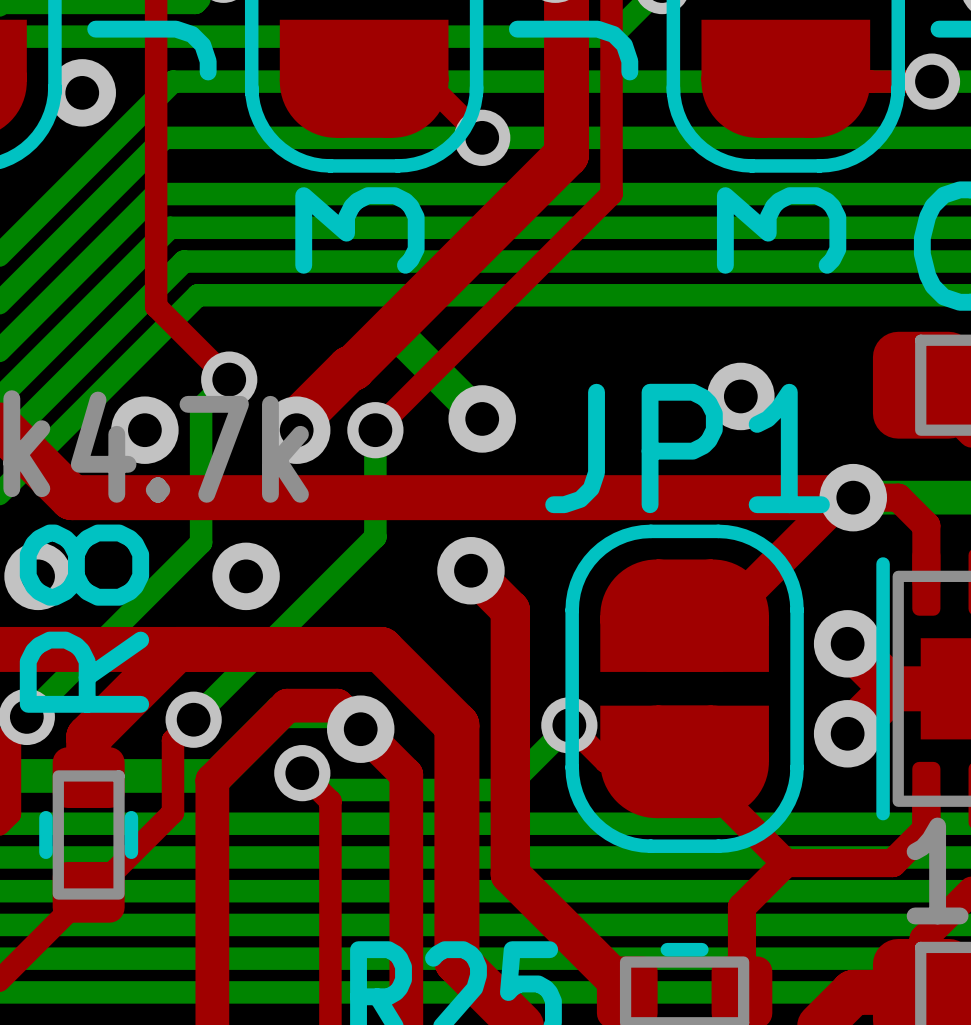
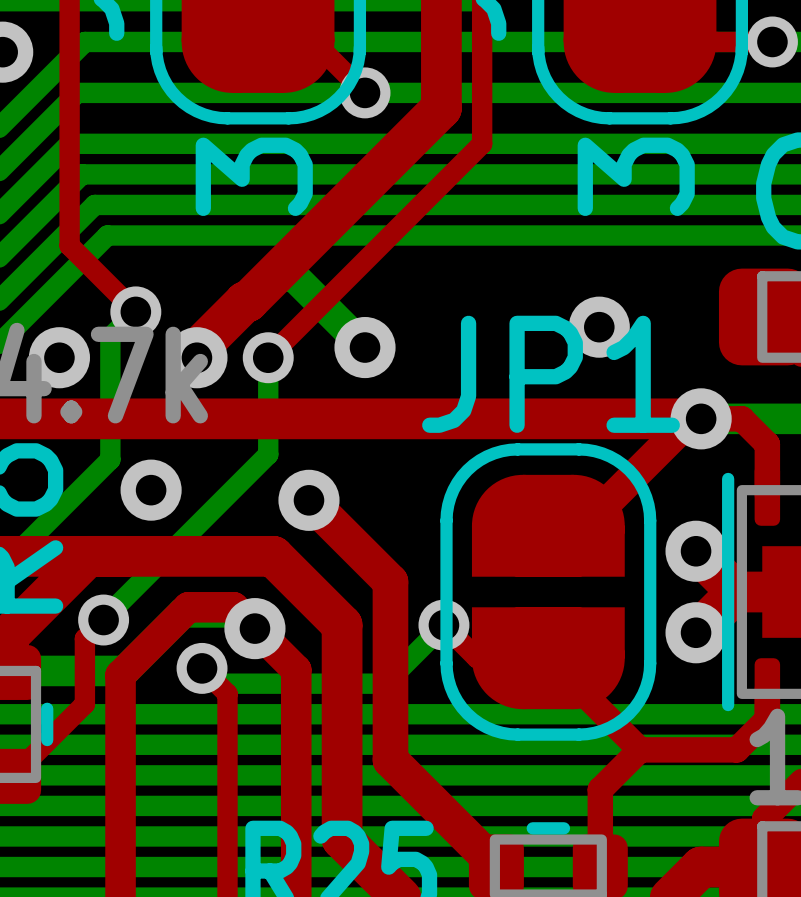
top track: (470, 570) (510, 610) (510, 677) -> (308, 500) (390, 581)
via position: (470, 570) -> (308, 500)

